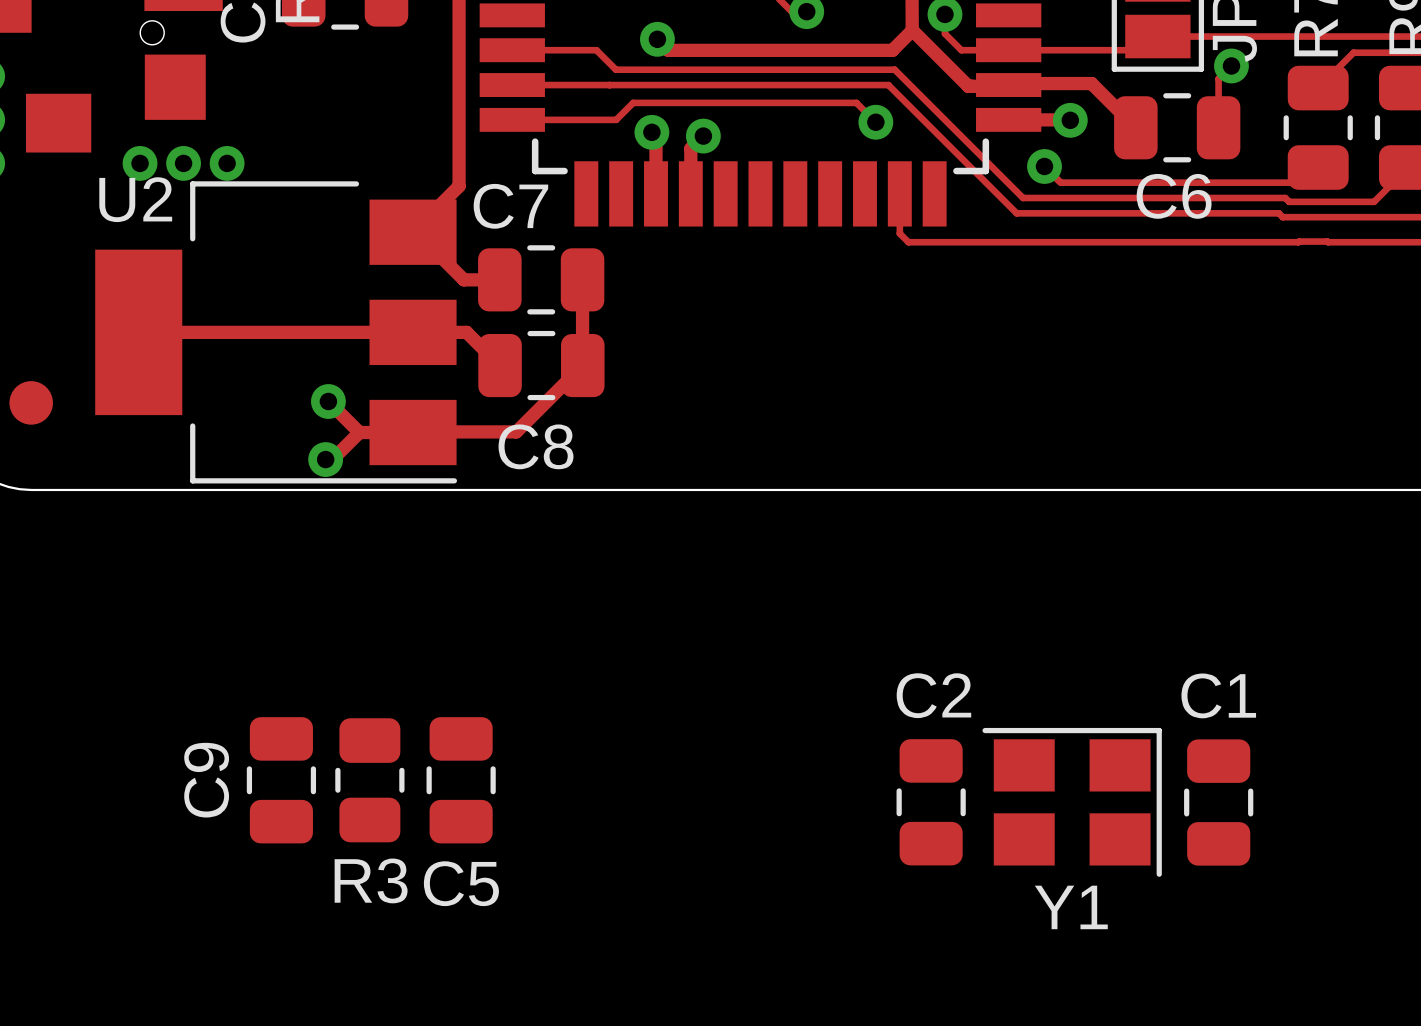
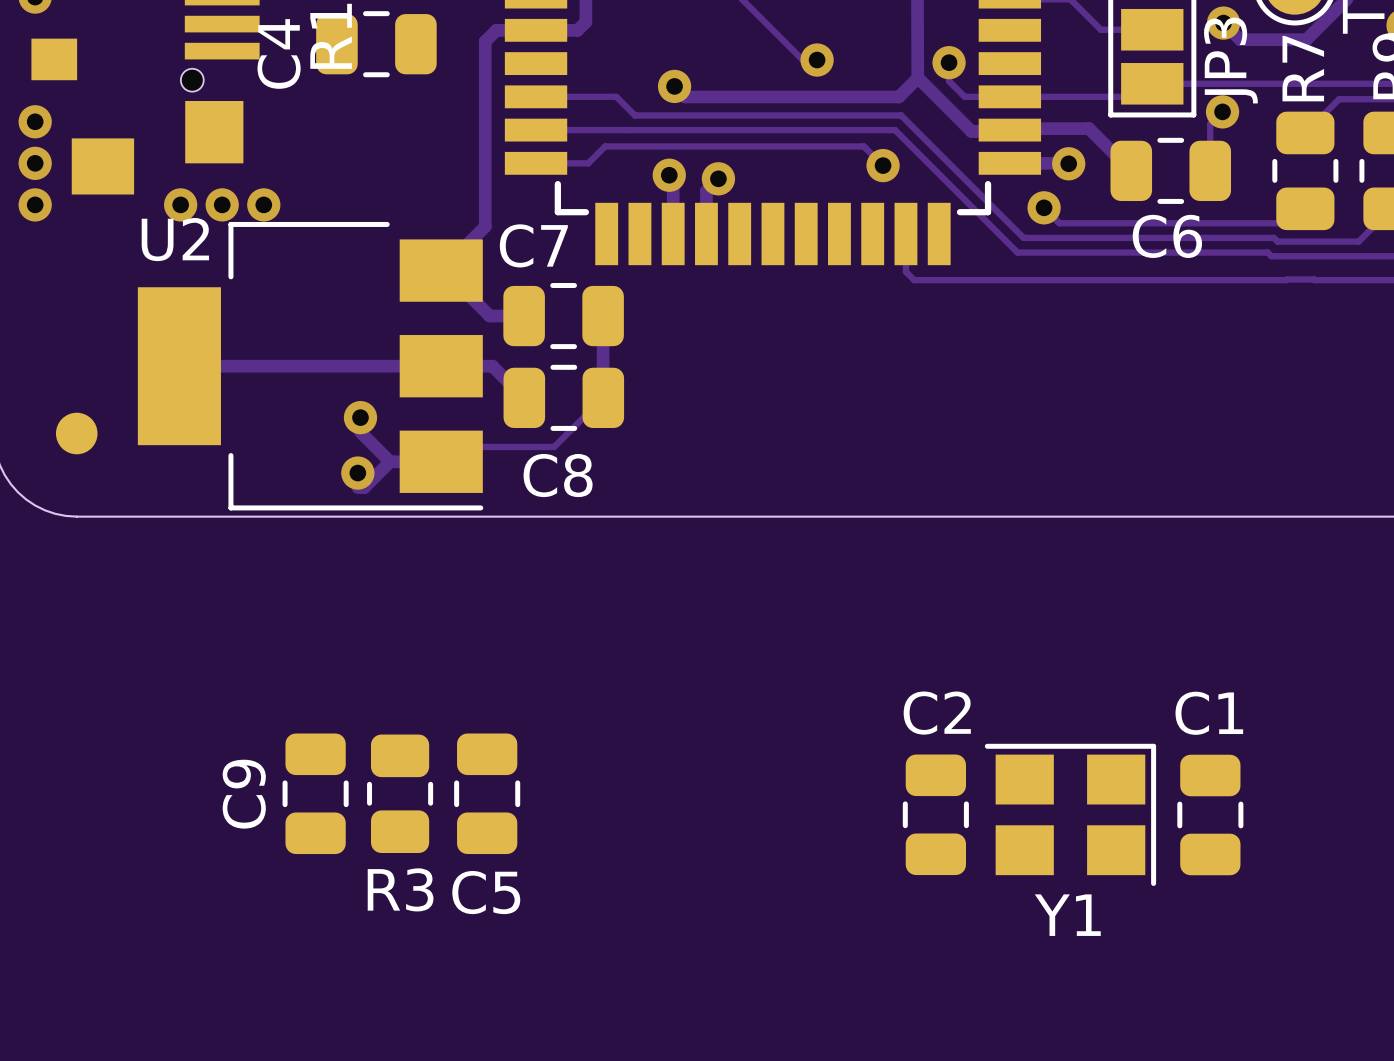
track: (856, 102) (633, 102) (616, 119) (567, 119) -> (864, 147) (605, 146) (588, 163)
track width: thick (582, 365) (531, 416) -> thin (603, 397) (554, 446)
via position: (328, 401) -> (360, 417)
track: (531, 416) (516, 431) (411, 431) -> (554, 446) (441, 446)
via position: (325, 459) -> (357, 473)

